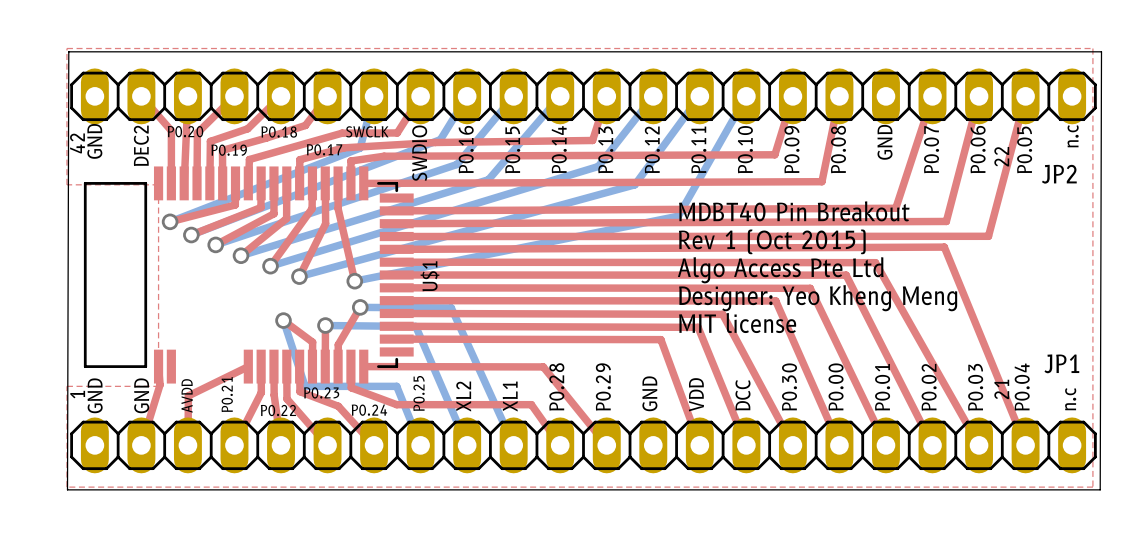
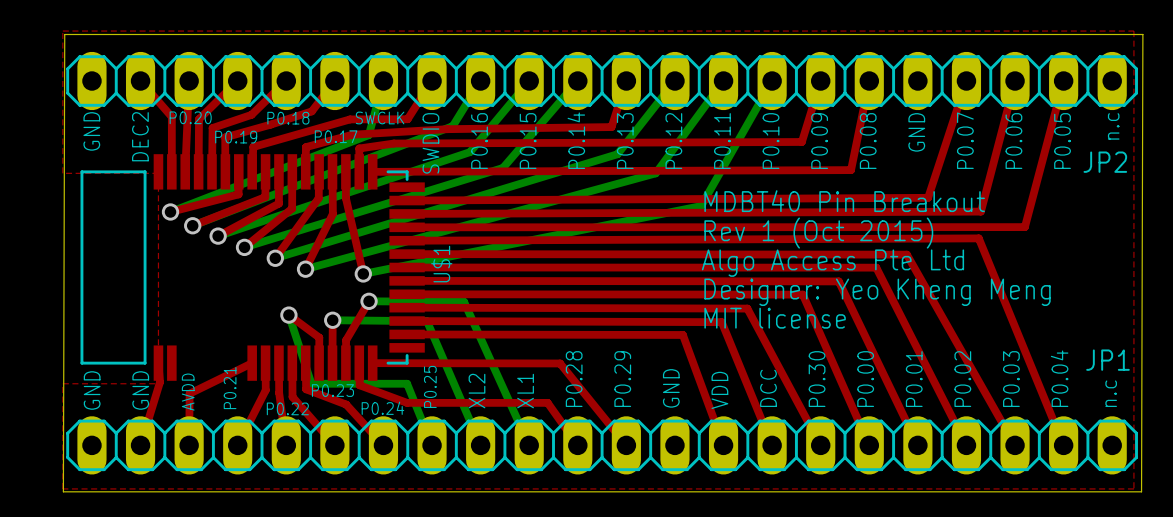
text: 42 (77, 143) -> none
text: 22 (1001, 156) -> none
text: 21 (1001, 389) -> none
text: 1 (77, 394) -> none

